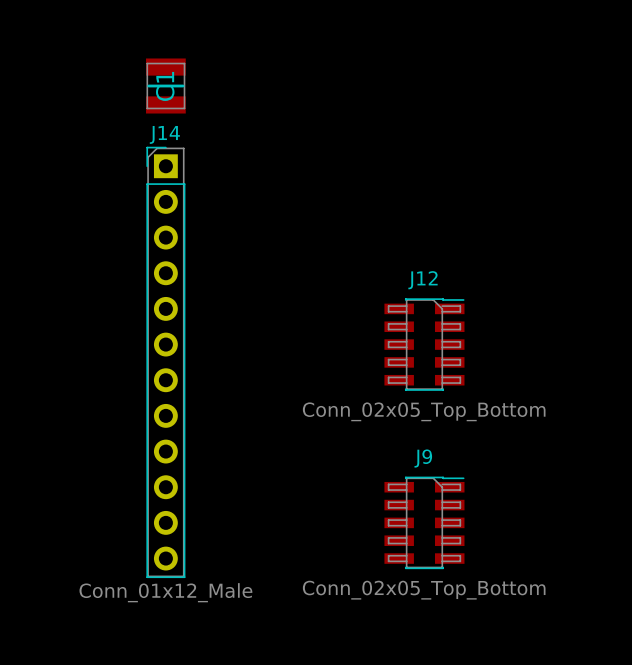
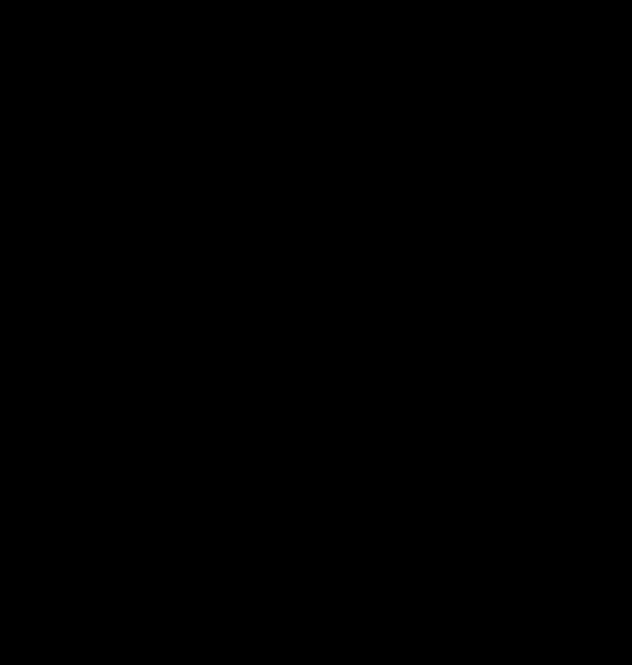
C1: (165, 86) -> none
J12: Conn_02x05_Top_Bottom (424, 344) -> none
J14: Conn_01x12_Male (165, 362) -> none
J9: Conn_02x05_Top_Bottom (424, 522) -> none

